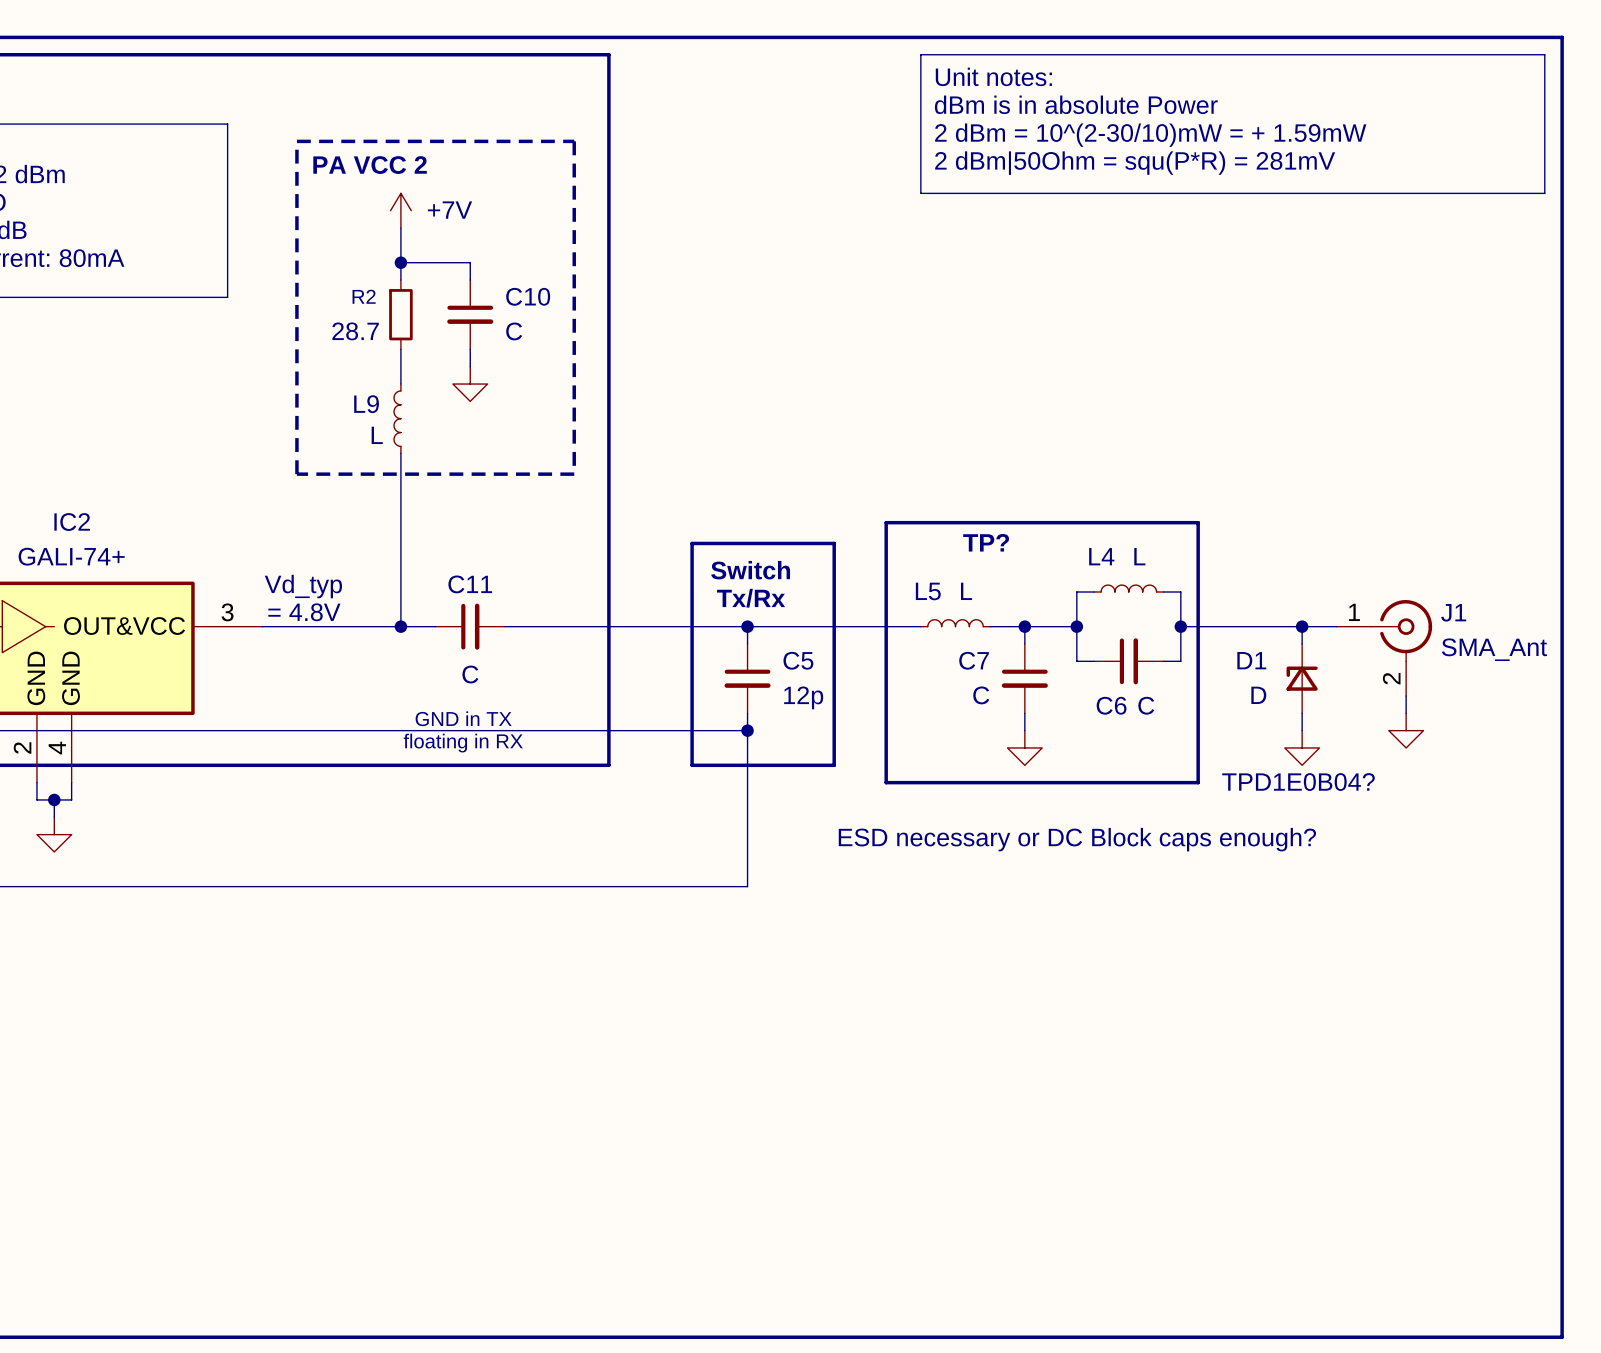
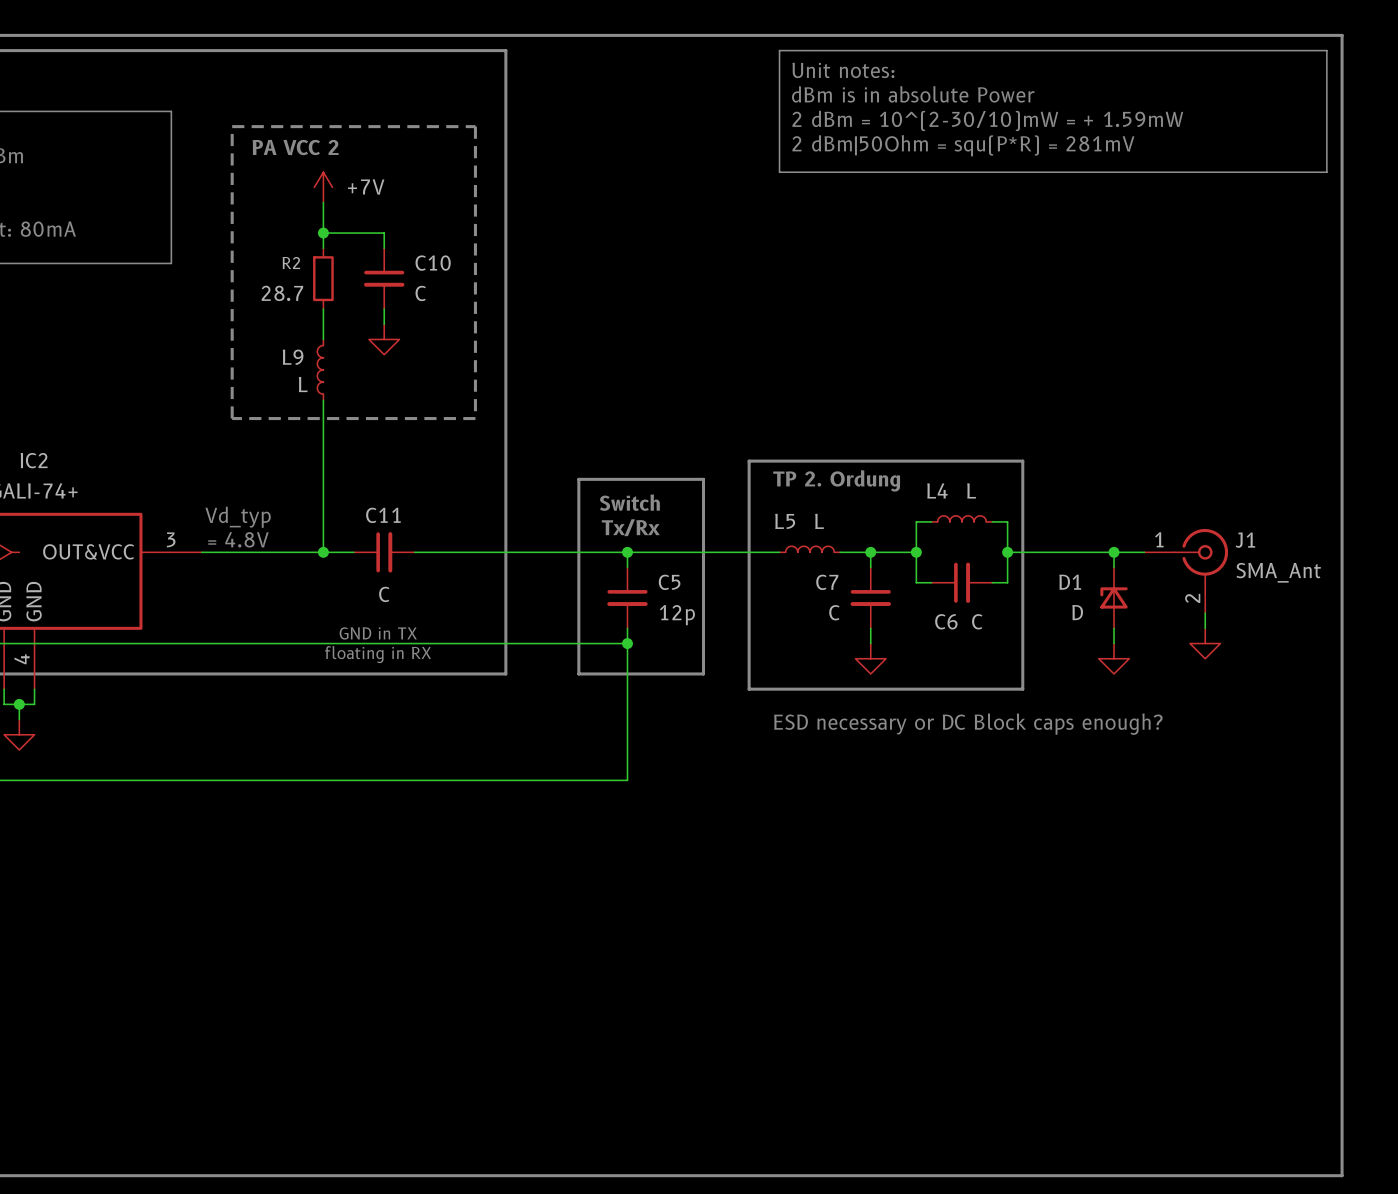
text: TP? (986, 542) -> TP 2. Ordung (836, 480)
text: TPD1E0B04? (1298, 782) -> none
text position: ESD necessary or DC Block caps enough? (1077, 839) -> ESD necessary or DC Block caps enough? (968, 724)

